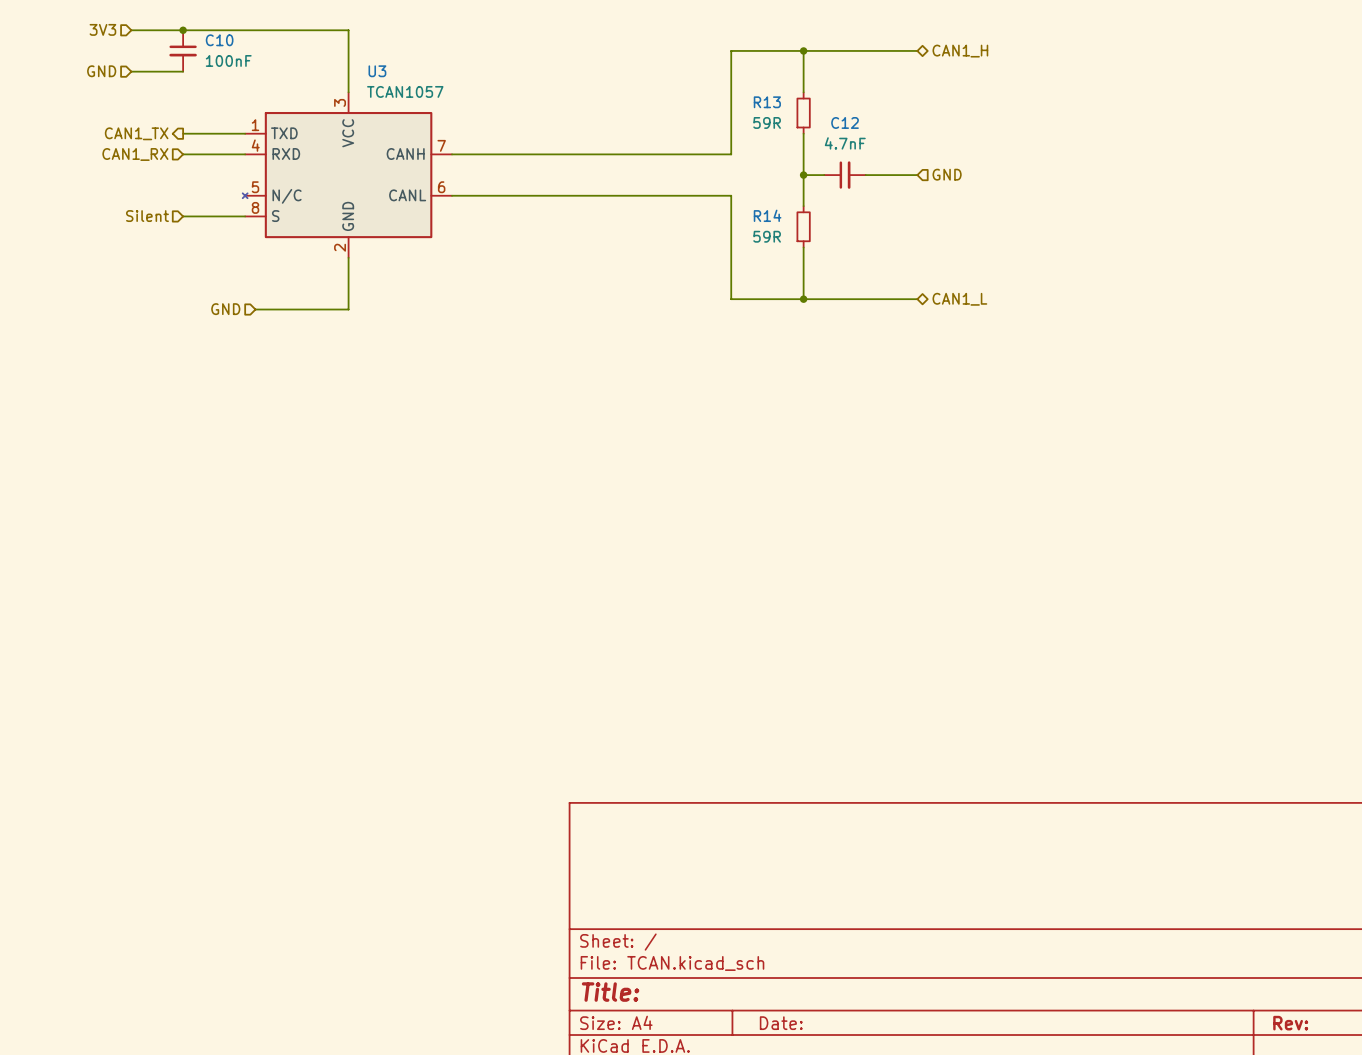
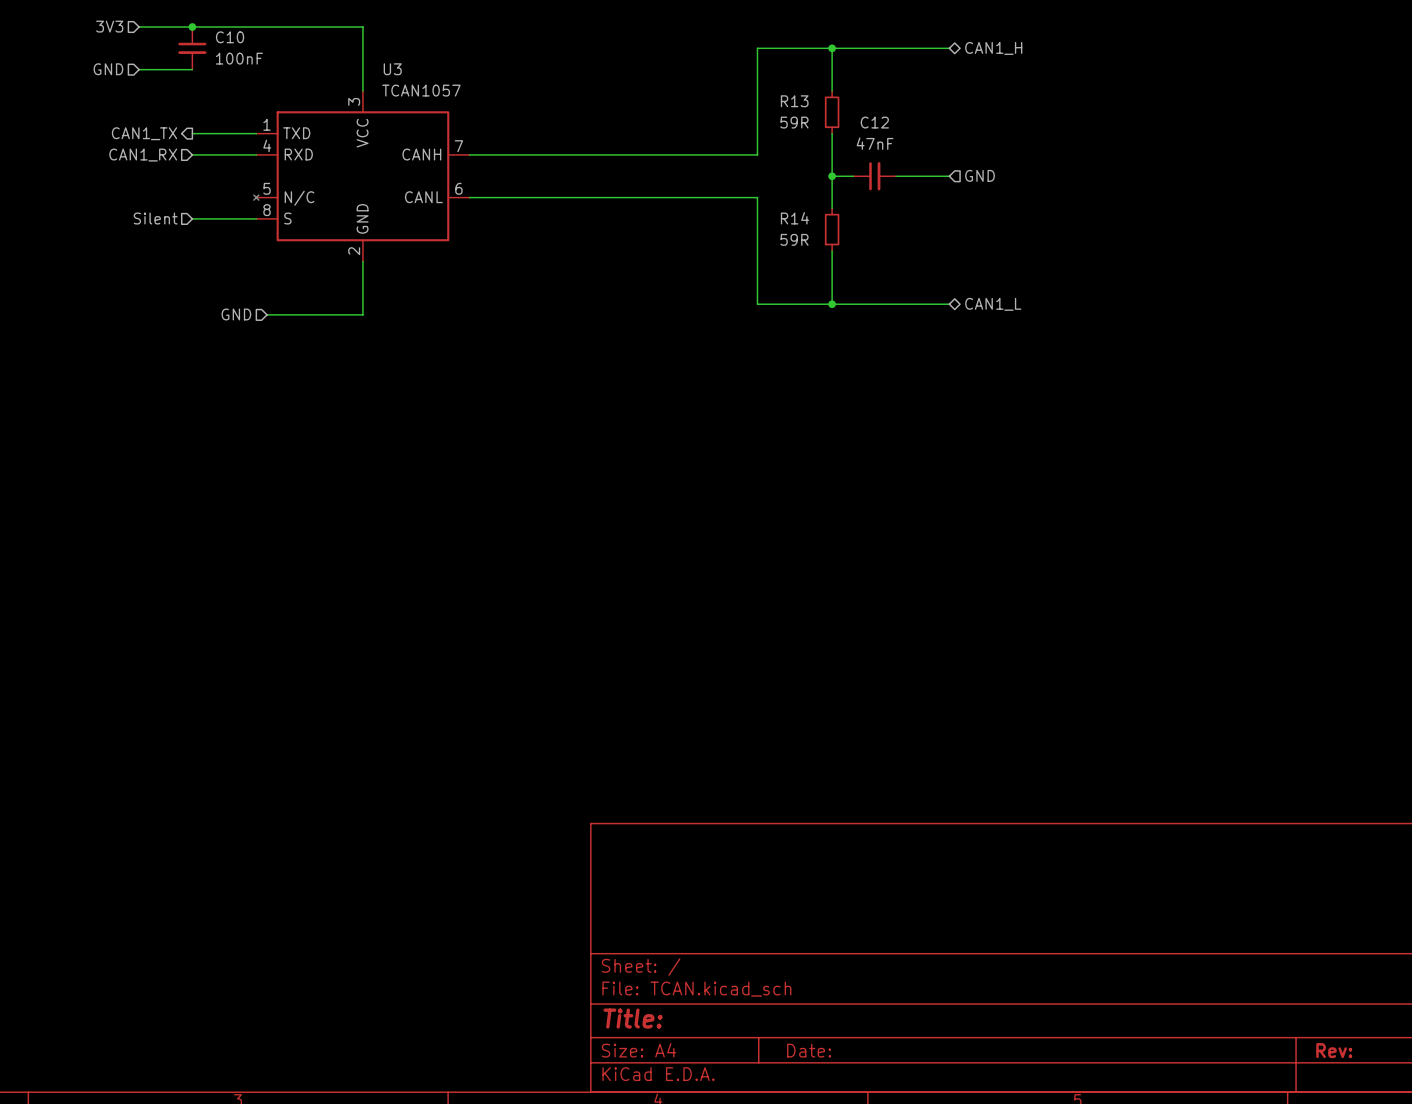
C12 value: 4.7nF (845, 143) -> 47nF (875, 143)

